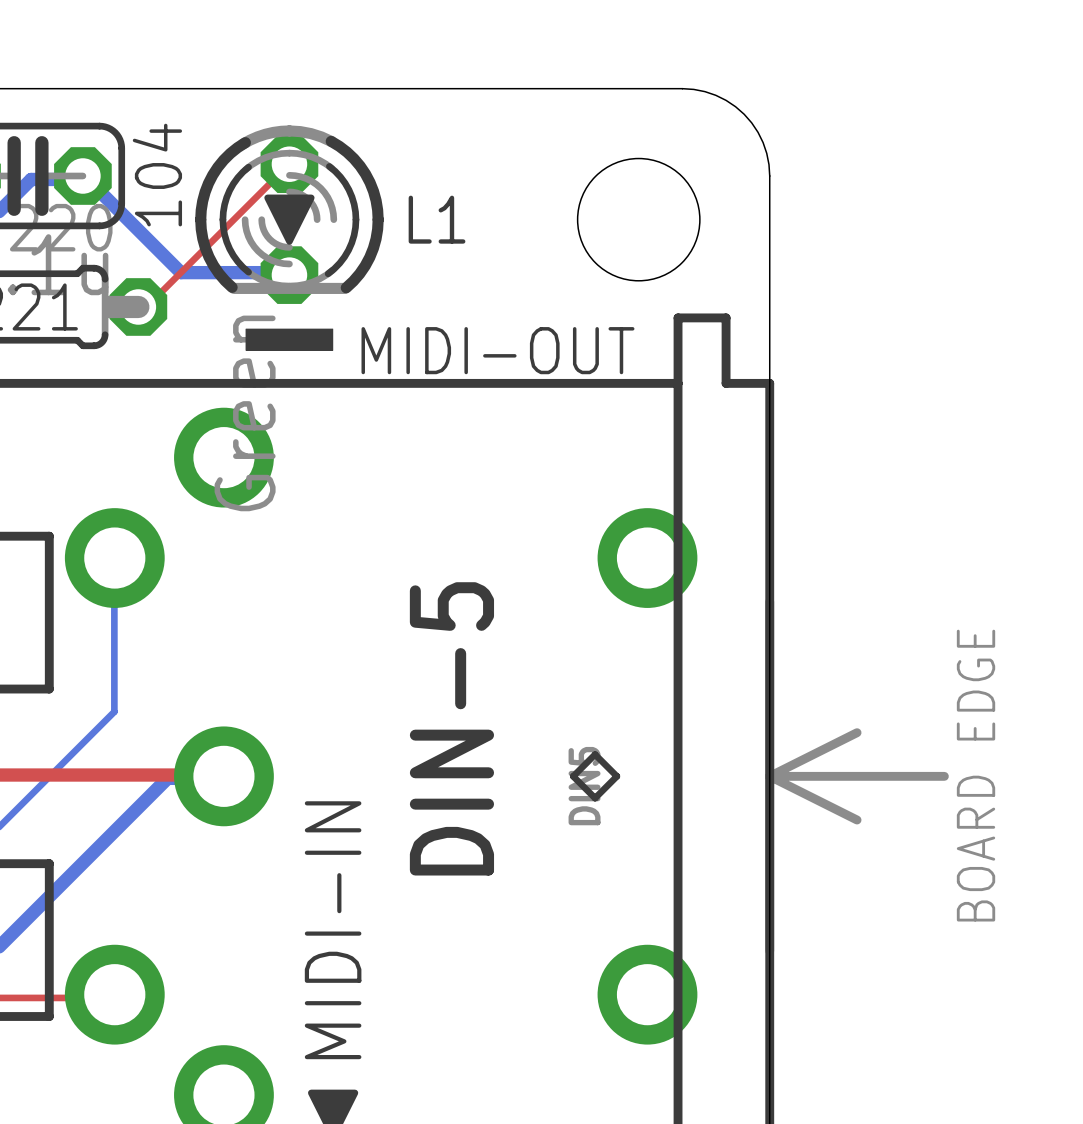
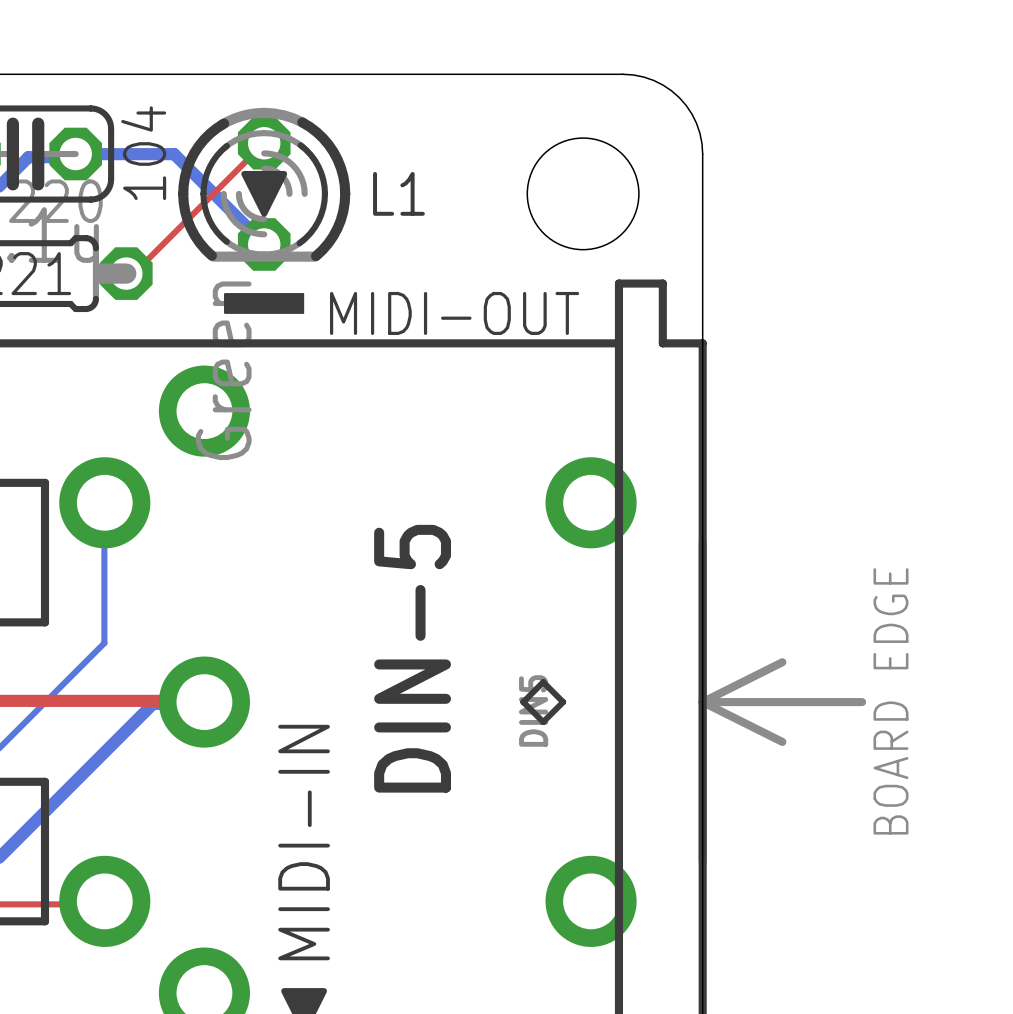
bottom track: (84, 176) (180, 272) (287, 272) -> (77, 154) (174, 154) (262, 242)

